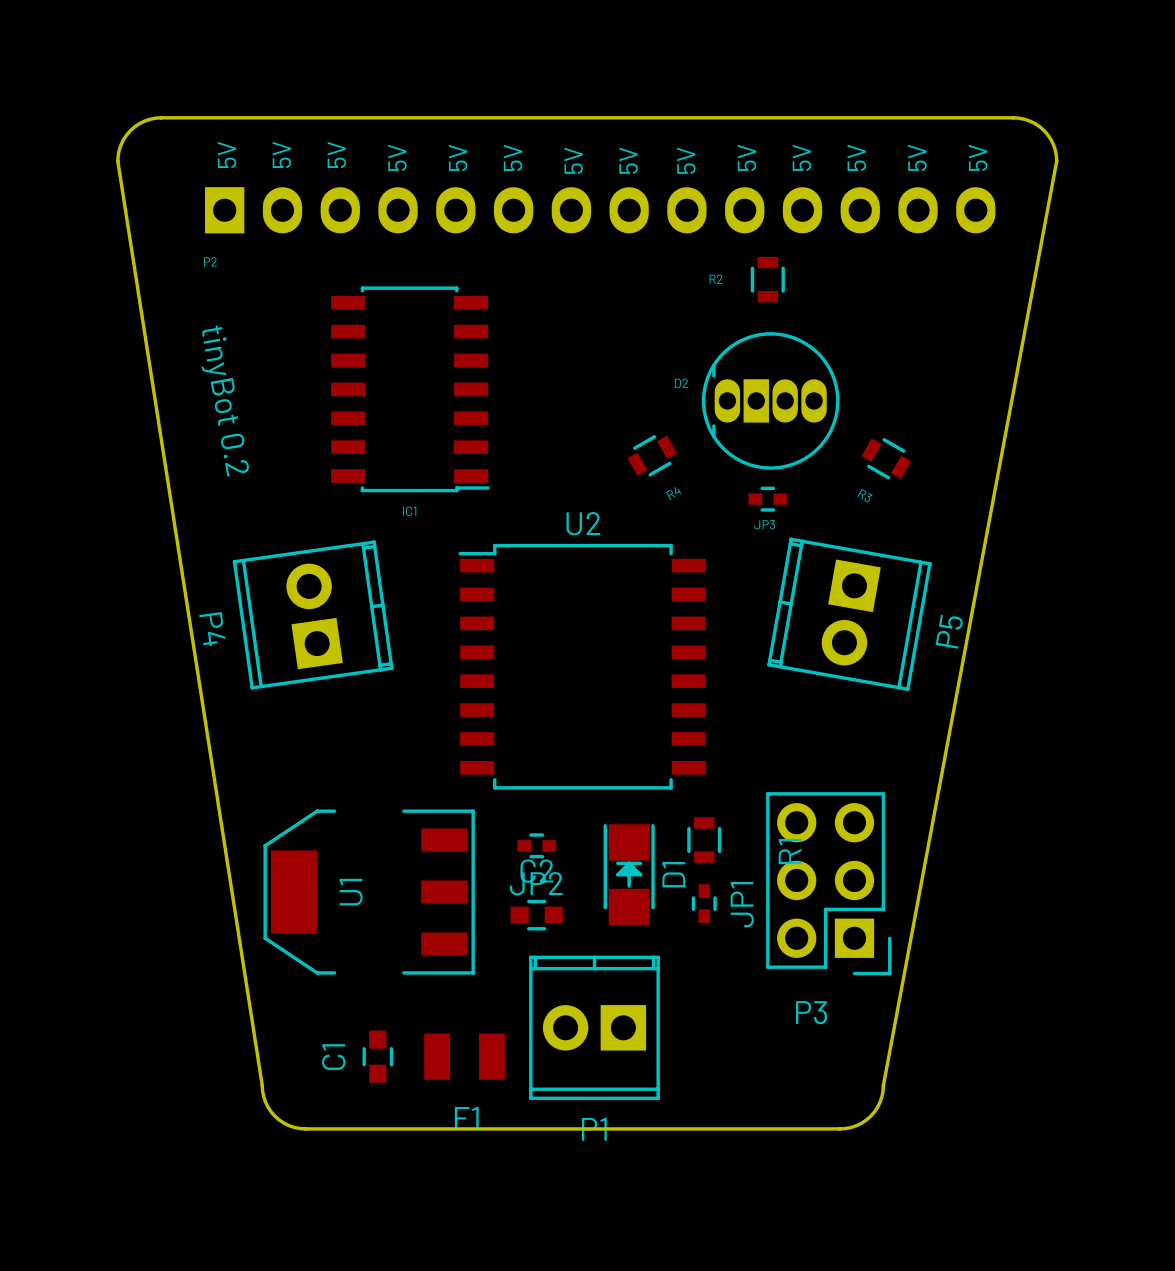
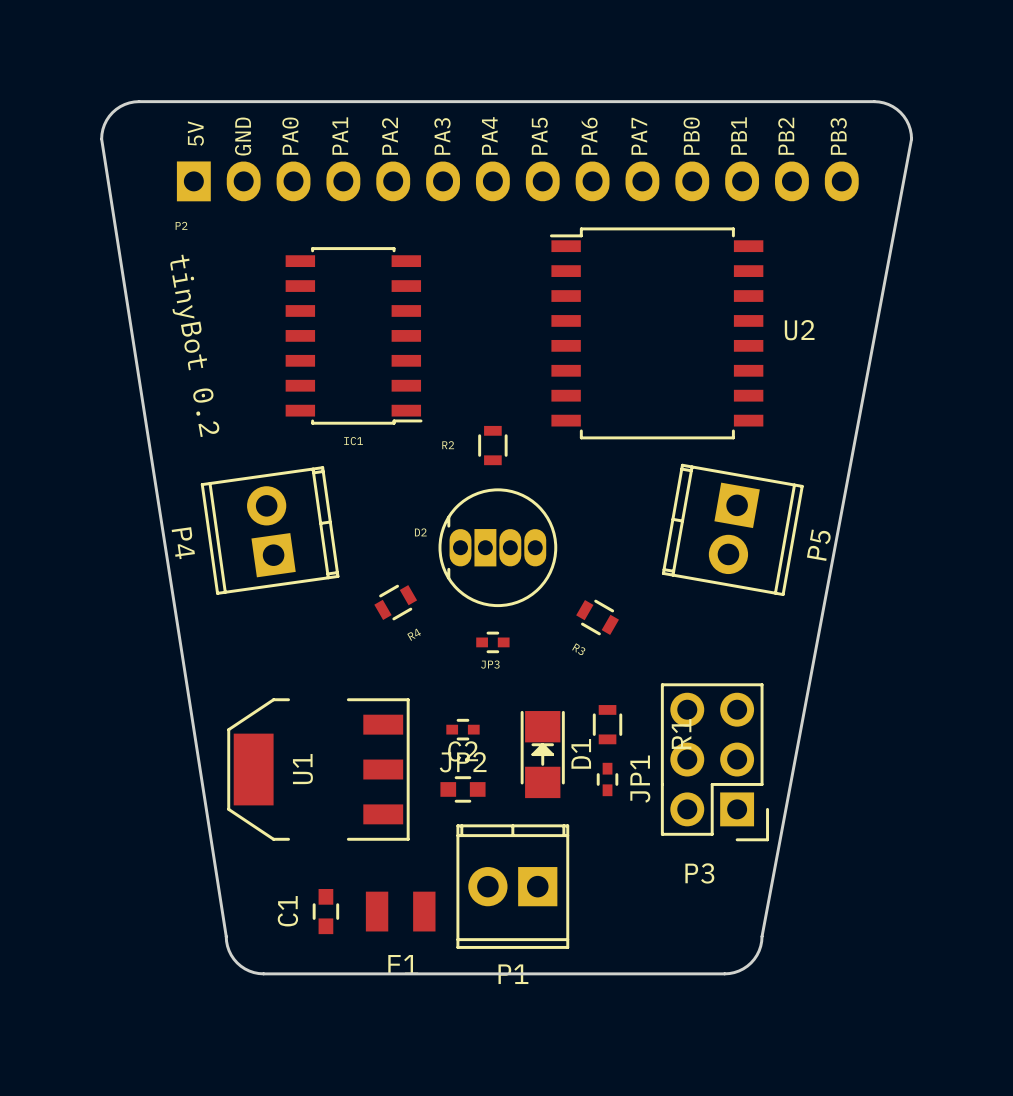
text: 5V (281, 154) -> GND (243, 136)
text: 5V (336, 154) -> PA0 (290, 136)
text: 5V (397, 157) -> PA1 (340, 136)
text: 5V (458, 157) -> PA2 (390, 136)
text: 5V (513, 157) -> PA3 (442, 136)
text: 5V (747, 157) -> PA7 (639, 136)
text: 5V (801, 157) -> PB0 (691, 136)
text: 5V (856, 157) -> PB1 (739, 136)
text: 5V (917, 157) -> PB2 (786, 136)
text: 5V (978, 157) -> PB3 (838, 136)
text: 5V (573, 160) -> PA4 (489, 135)
text: 5V (628, 160) -> PA5 (539, 136)
text: 5V (686, 160) -> PA6 (589, 136)
R2 position: (767, 279) -> (492, 445)
D2 position: (770, 400) -> (497, 547)
R4 position: (652, 455) -> (395, 602)
R3 position: (886, 458) -> (597, 617)
JP3 position: (767, 499) -> (492, 642)
U2 name position: U2 (583, 523) -> U2 (799, 330)
U2 position: (582, 666) -> (656, 333)

